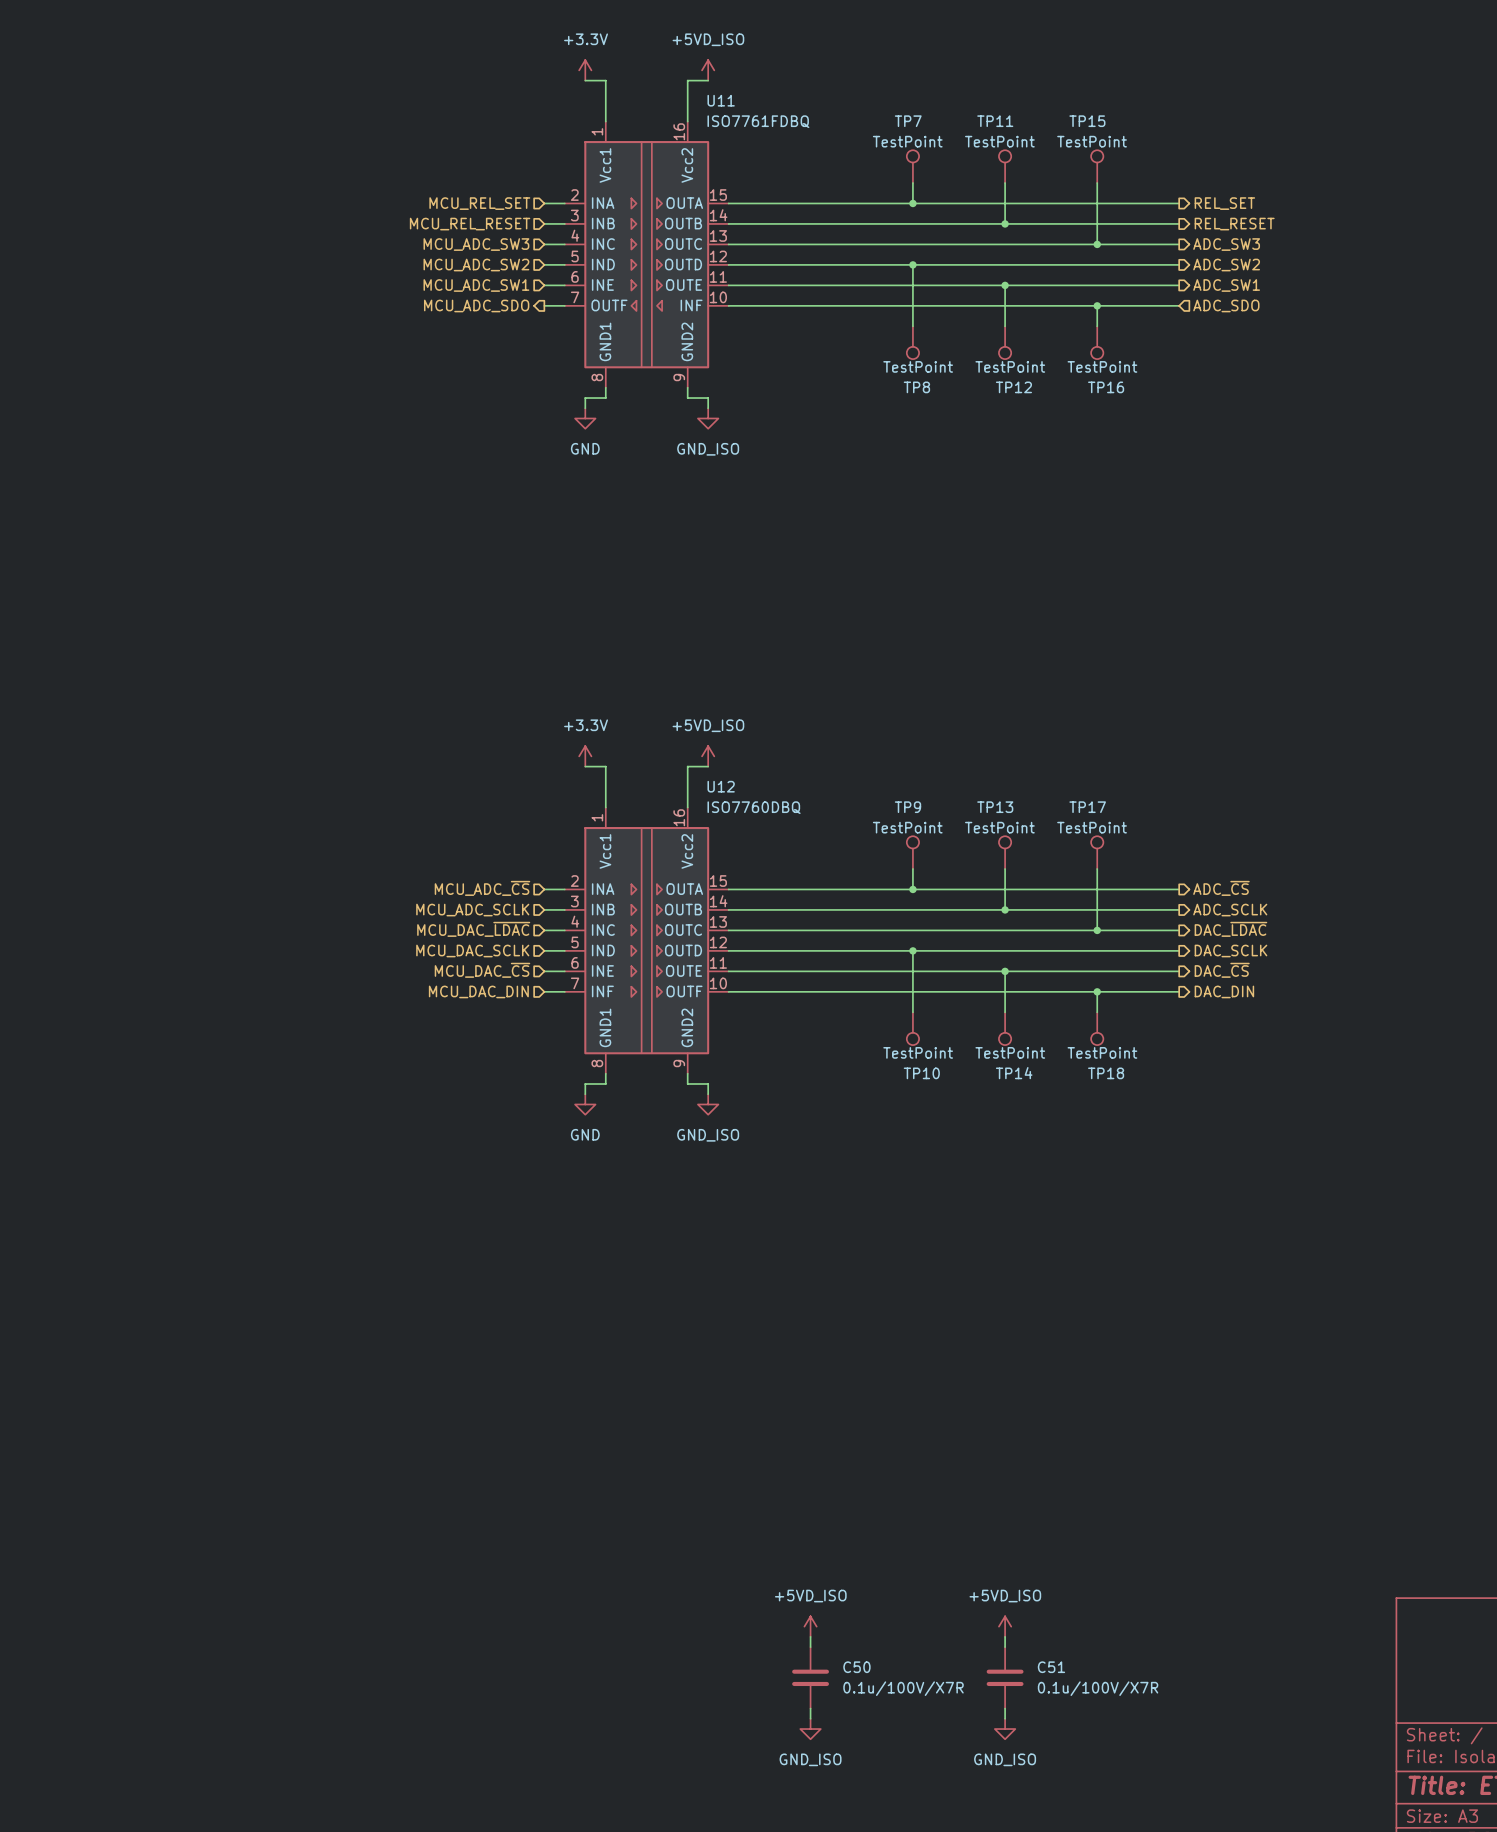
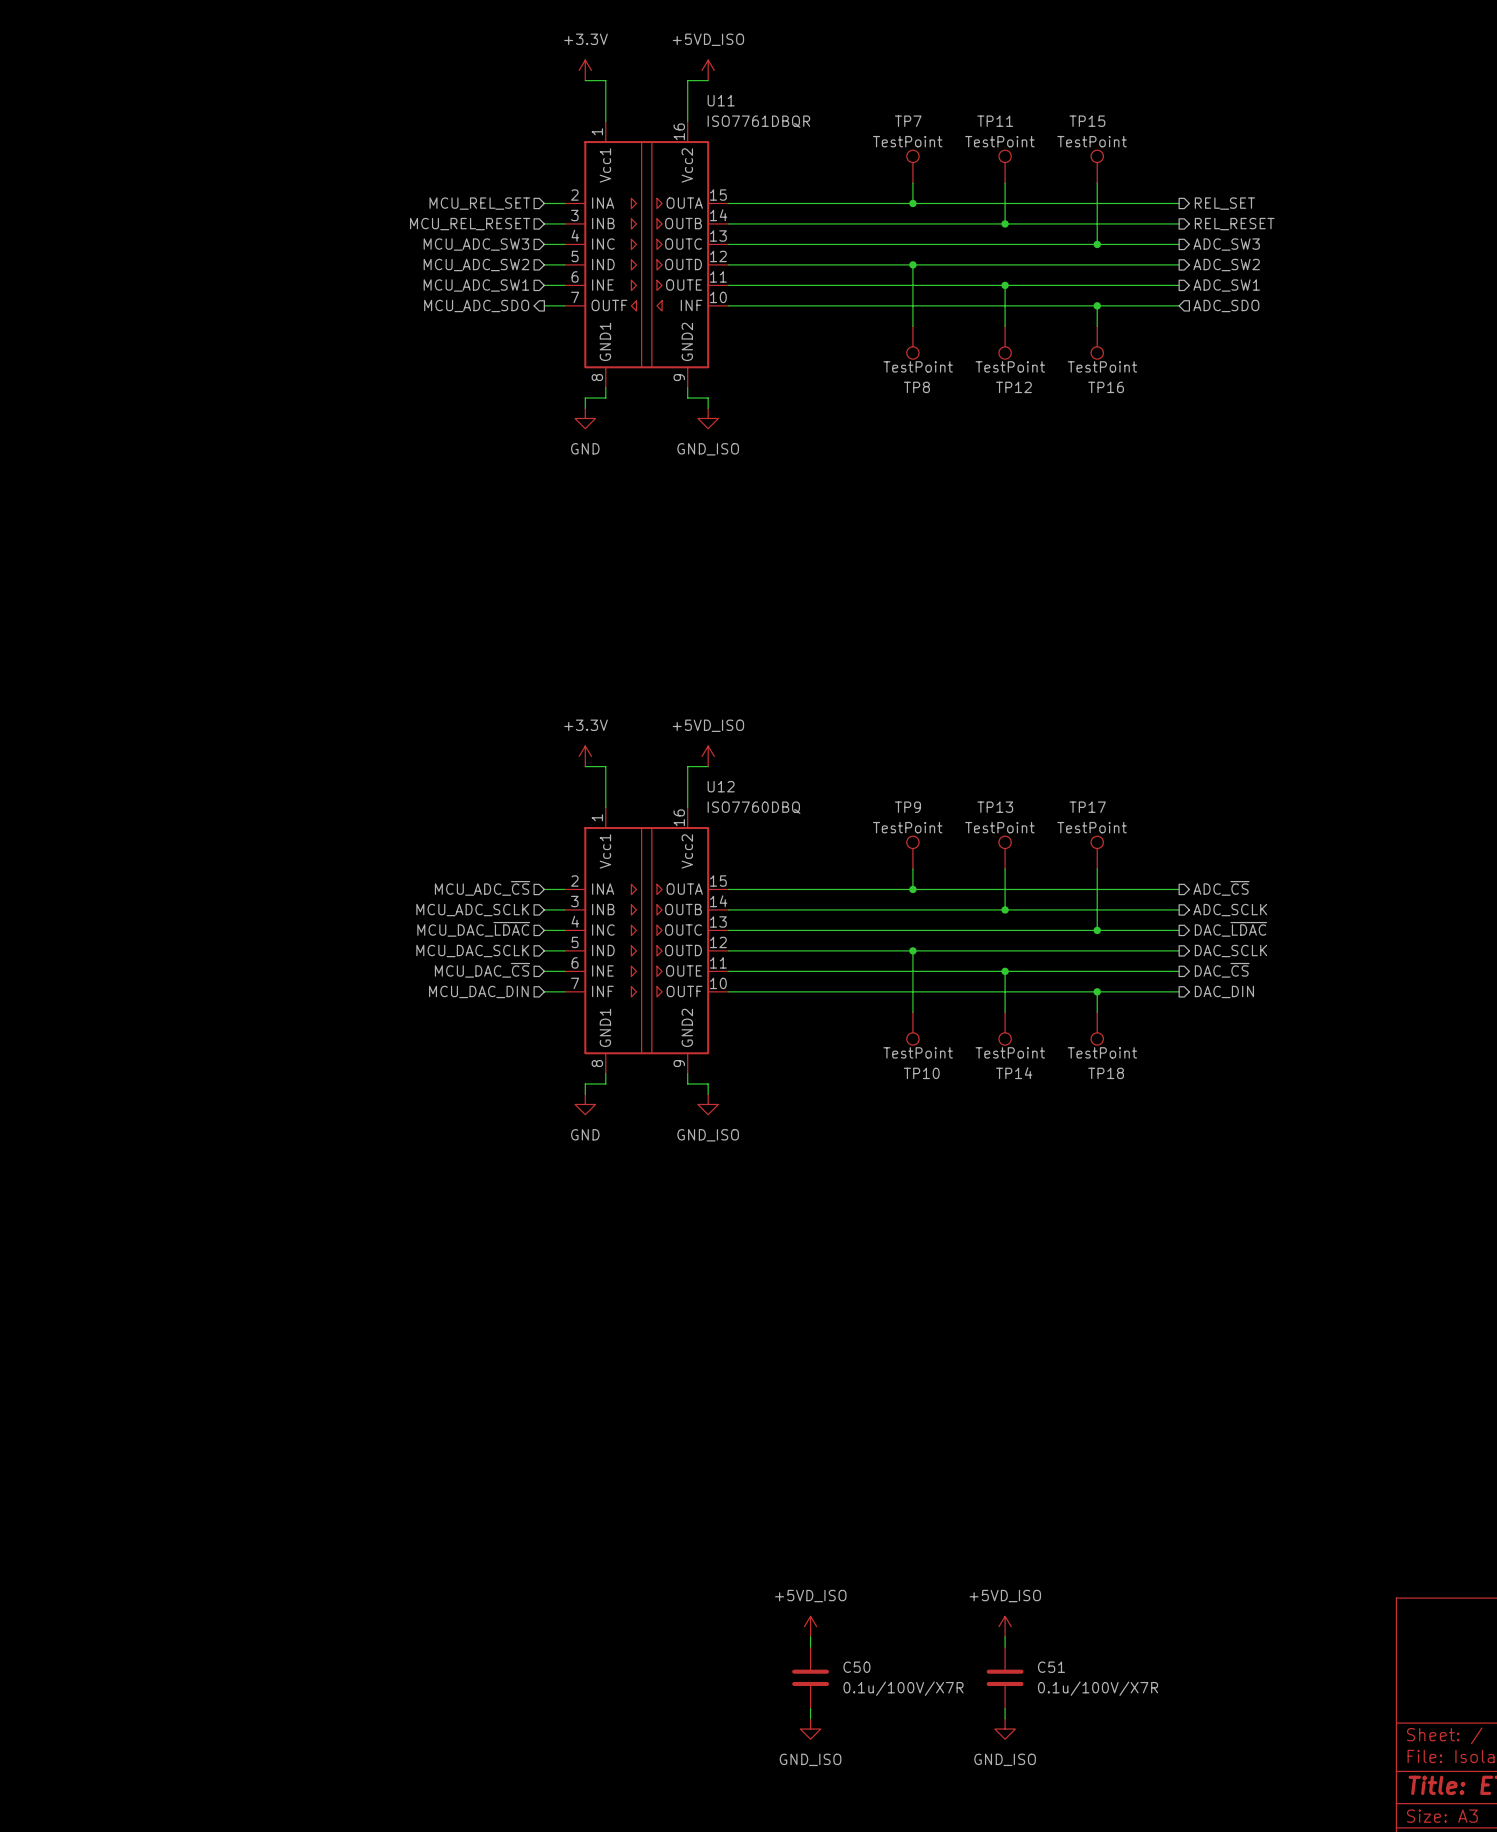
U11 value: ISO7761FDBQ (758, 121) -> ISO7761DBQR (758, 121)

